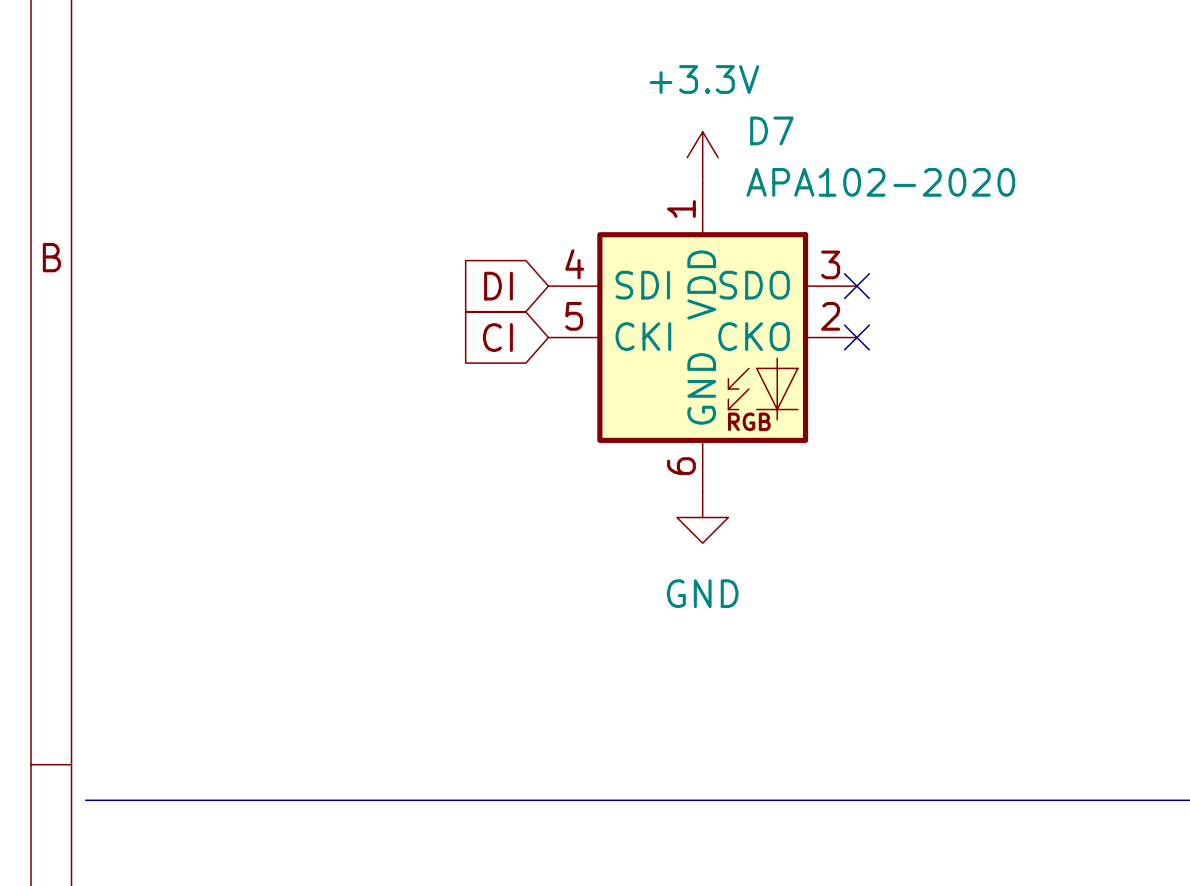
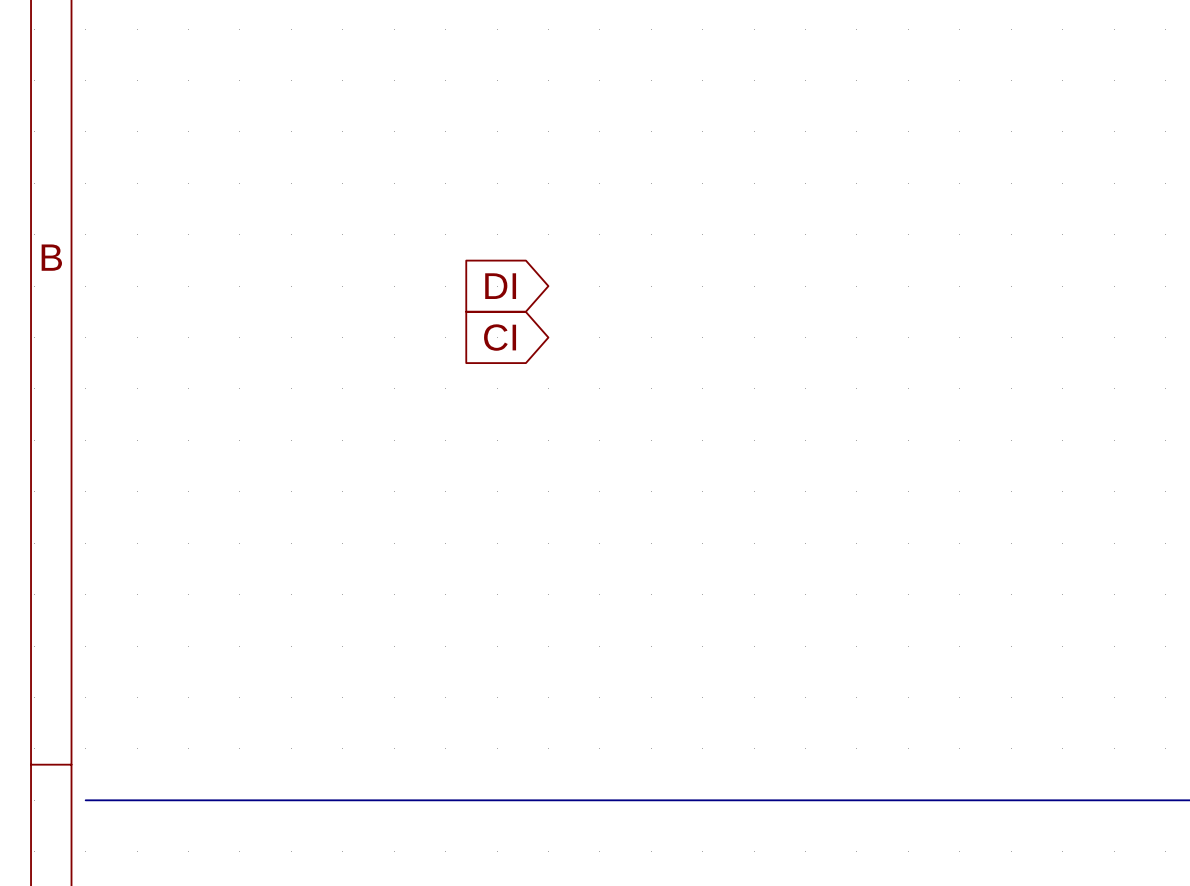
power symbol: +3.3V (702, 157) -> none
no-connect mark: (856, 286) -> none
D7: APA102-2020 (702, 337) -> none
no-connect mark: (856, 337) -> none
power symbol: GND (702, 517) -> none

